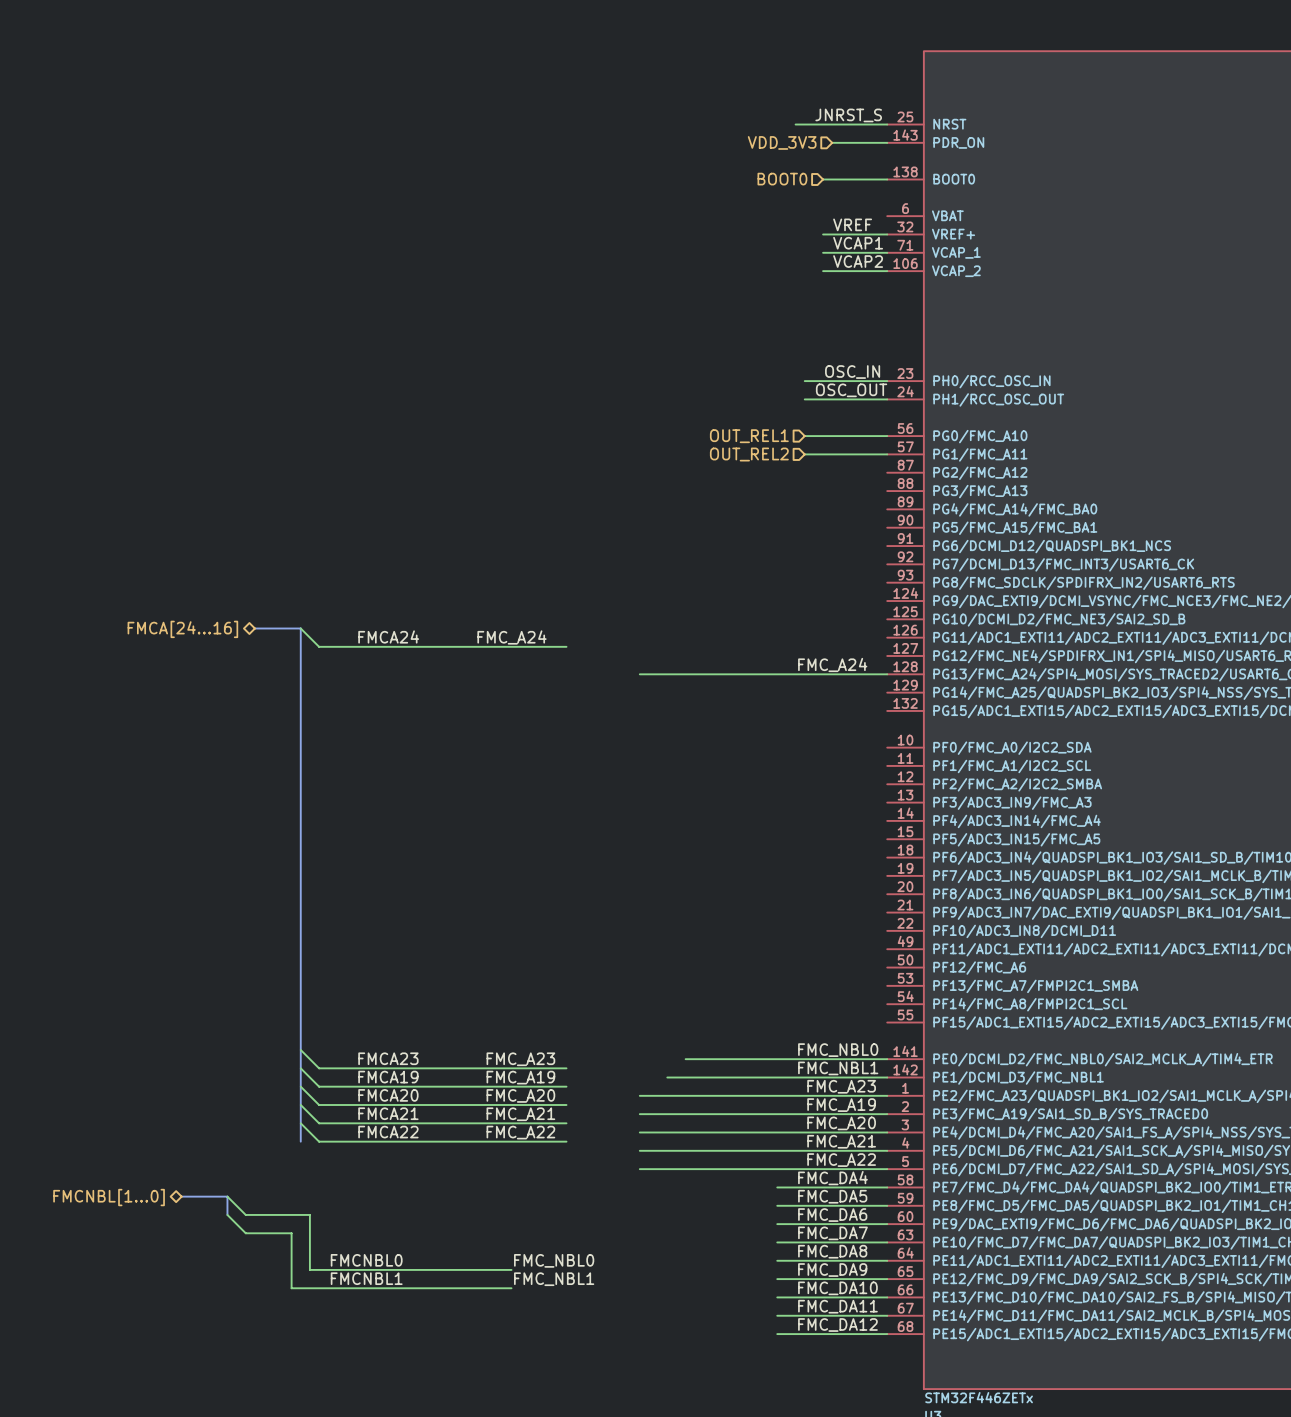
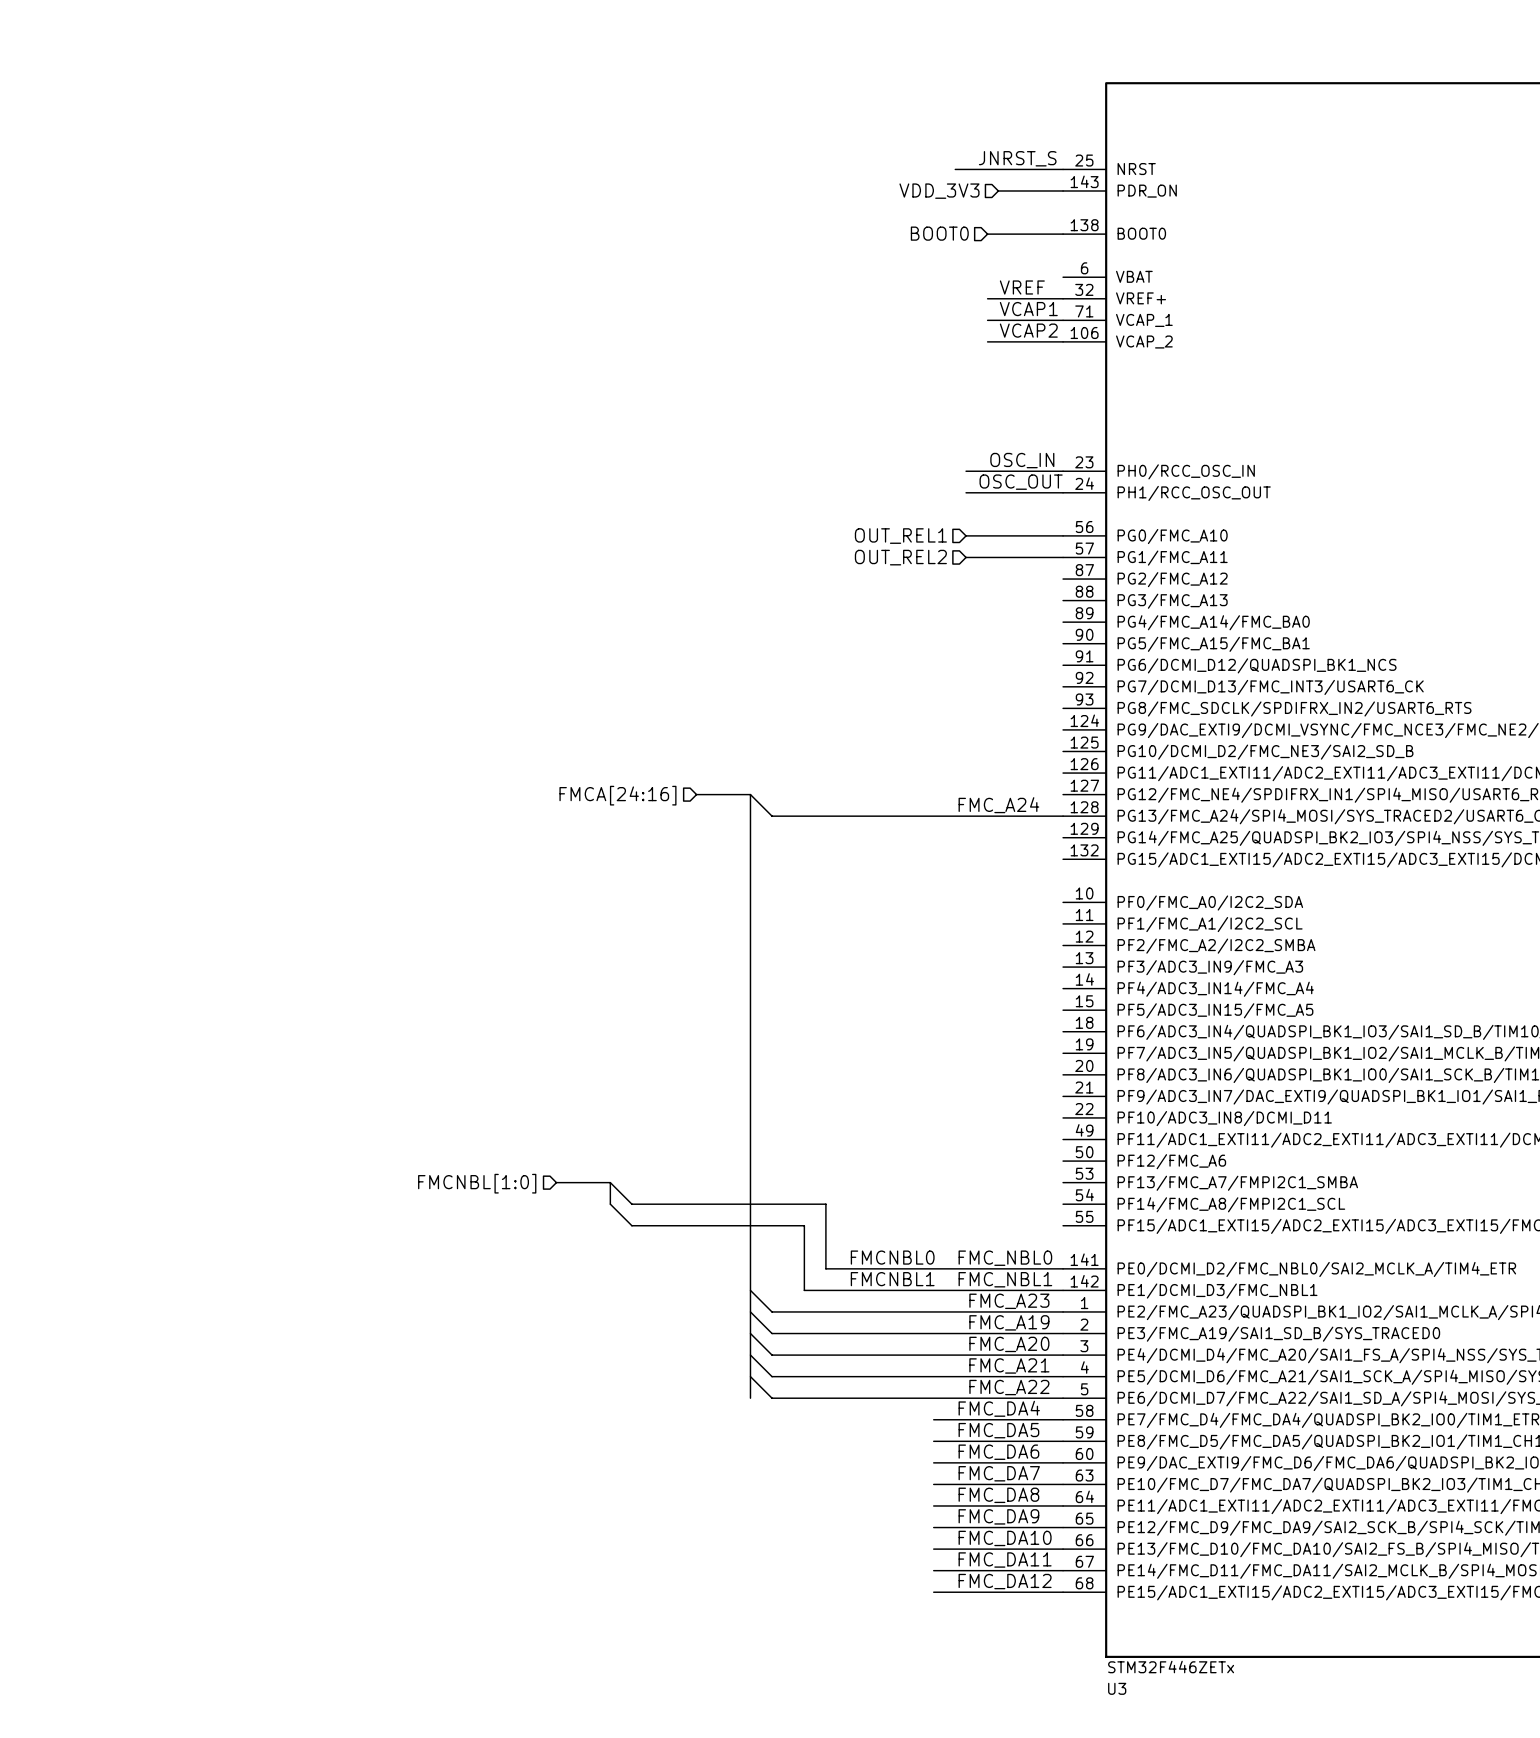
bus: (254, 628) (300, 628) (300, 1141) -> none
wire: (300, 628) (319, 646) (566, 646) -> none
hierarchical label: FMCA[24...16] (182, 629) -> none
label: FMCA24 (388, 636) -> none
label: FMC_A24 (511, 637) -> none
bus: none -> (696, 794) (750, 794) (750, 1398)
wire: none -> (750, 794) (772, 816)
hierarchical label: none -> FMCA[24:16] (617, 795)
bus: none -> (556, 1182) (610, 1182) (610, 1204)
wire: none -> (610, 1182) (631, 1204) (825, 1204) (825, 1268)
hierarchical label: none -> FMCNBL[1:0] (477, 1183)
wire: none -> (610, 1204) (631, 1225) (804, 1225) (804, 1290)
label: none -> FMCNBL0 (892, 1257)
wire: (300, 1050) (319, 1068) (566, 1068) -> none
label: FMCA23 (388, 1058) -> none
label: FMC_A23 (520, 1059) -> none
label: none -> FMCNBL1 (892, 1279)
wire: (300, 1068) (319, 1086) (566, 1086) -> none
label: FMCA19 (388, 1077) -> none
label: FMC_A19 (520, 1077) -> none
wire: none -> (750, 1290) (772, 1311)
wire: (300, 1086) (319, 1105) (566, 1105) -> none
label: FMCA20 (388, 1095) -> none
label: FMC_A20 (520, 1095) -> none
wire: none -> (750, 1311) (772, 1333)
wire: (300, 1105) (319, 1123) (566, 1123) -> none
label: FMCA21 (388, 1113) -> none
label: FMC_A21 (520, 1114) -> none
wire: none -> (750, 1333) (772, 1355)
wire: (300, 1123) (319, 1141) (566, 1141) -> none
label: FMCA22 (388, 1132) -> none
label: FMC_A22 (520, 1132) -> none
wire: none -> (750, 1355) (772, 1376)
wire: none -> (750, 1376) (772, 1398)
bus: (181, 1196) (227, 1196) (227, 1214) -> none
wire: (227, 1196) (245, 1214) (309, 1214) (309, 1269) (511, 1269) -> none
hierarchical label: FMCNBL[1...0] (109, 1197) -> none
wire: (227, 1214) (245, 1233) (291, 1233) (291, 1288) (511, 1288) -> none
label: FMCNBL0 (366, 1260) -> none
label: FMC_NBL0 (554, 1260) -> none
label: FMCNBL1 (366, 1278) -> none
label: FMC_NBL1 (554, 1279) -> none

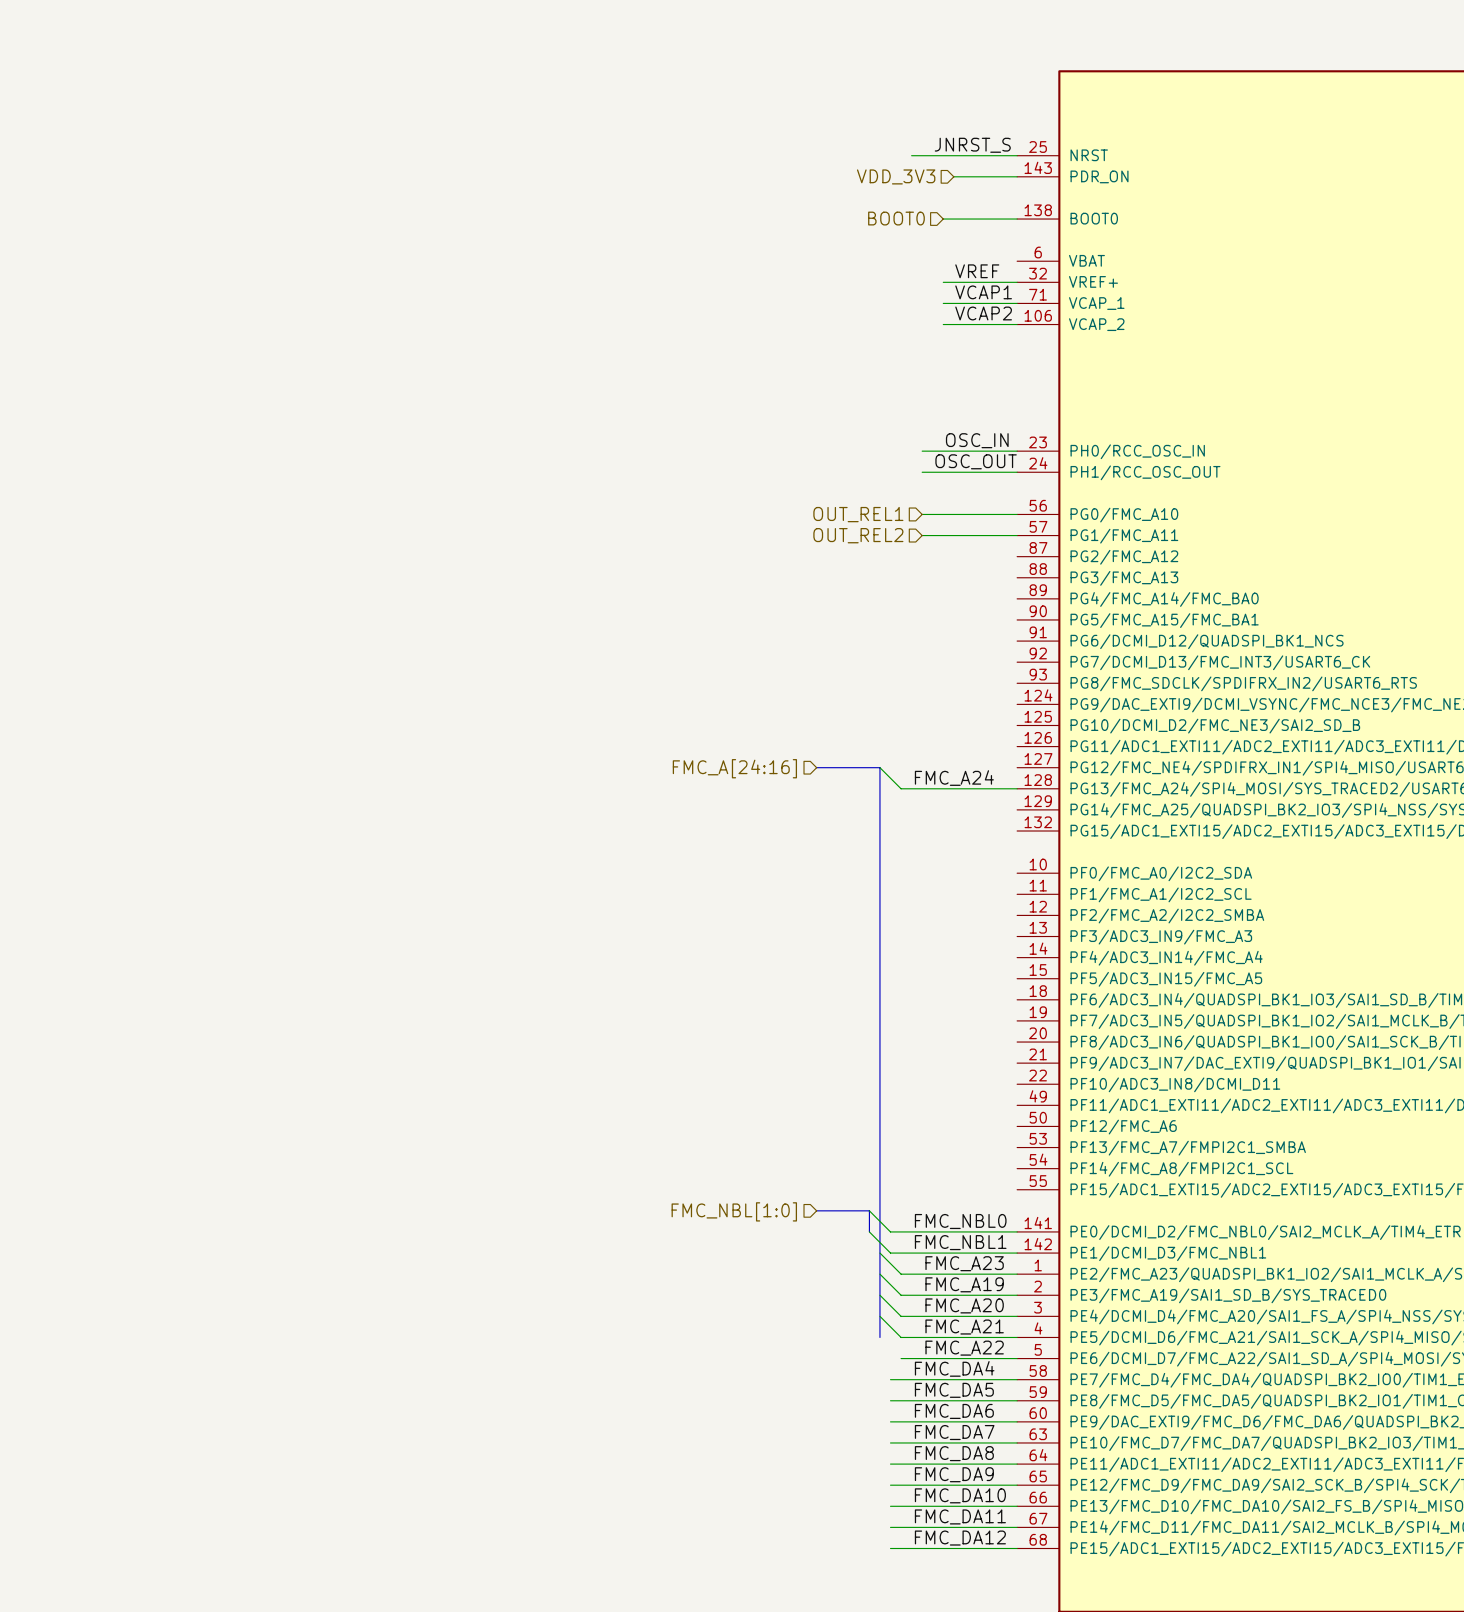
bus: (696, 794) (750, 794) (750, 1398) -> none
wire: (750, 794) (772, 816) (944, 816) -> (879, 767) (901, 788)
bus: none -> (816, 767) (879, 767) (879, 1337)
hierarchical label: FMCA[24:16] (617, 795) -> none
hierarchical label: none -> FMC_A[24:16] (734, 768)
bus: (556, 1182) (610, 1182) (610, 1204) -> none
wire: (610, 1182) (631, 1204) (825, 1204) (825, 1268) (933, 1268) -> (869, 1210) (890, 1231)
hierarchical label: FMCNBL[1:0] (477, 1183) -> none
wire: (610, 1204) (631, 1225) (804, 1225) (804, 1290) (933, 1290) -> (869, 1231) (890, 1253)
bus: none -> (816, 1210) (869, 1210) (869, 1231)
hierarchical label: none -> FMC_NBL[1:0] (734, 1211)
label: FMCNBL0 (892, 1257) -> none
label: FMCNBL1 (892, 1279) -> none
wire: (750, 1290) (772, 1311) (944, 1311) -> (879, 1253) (901, 1274)
wire: (750, 1311) (772, 1333) (944, 1333) -> (879, 1274) (901, 1295)
wire: (750, 1333) (772, 1355) (944, 1355) -> (879, 1295) (901, 1316)
wire: (750, 1355) (772, 1376) (944, 1376) -> (879, 1316) (901, 1337)
wire: (750, 1376) (772, 1398) (944, 1398) -> none

